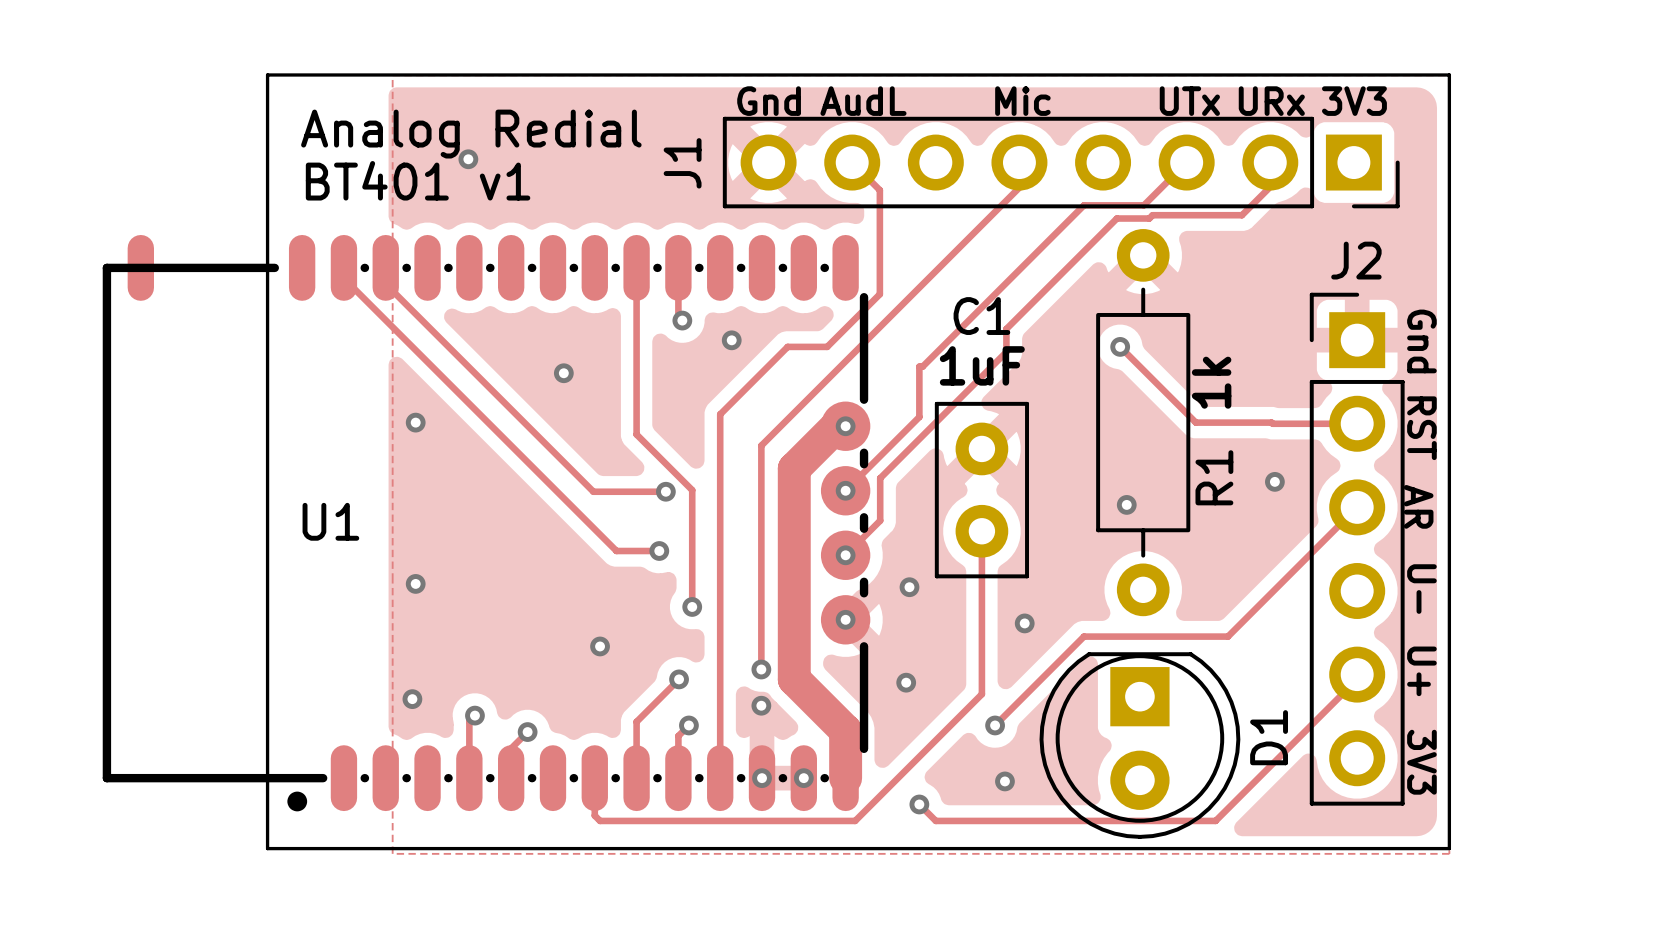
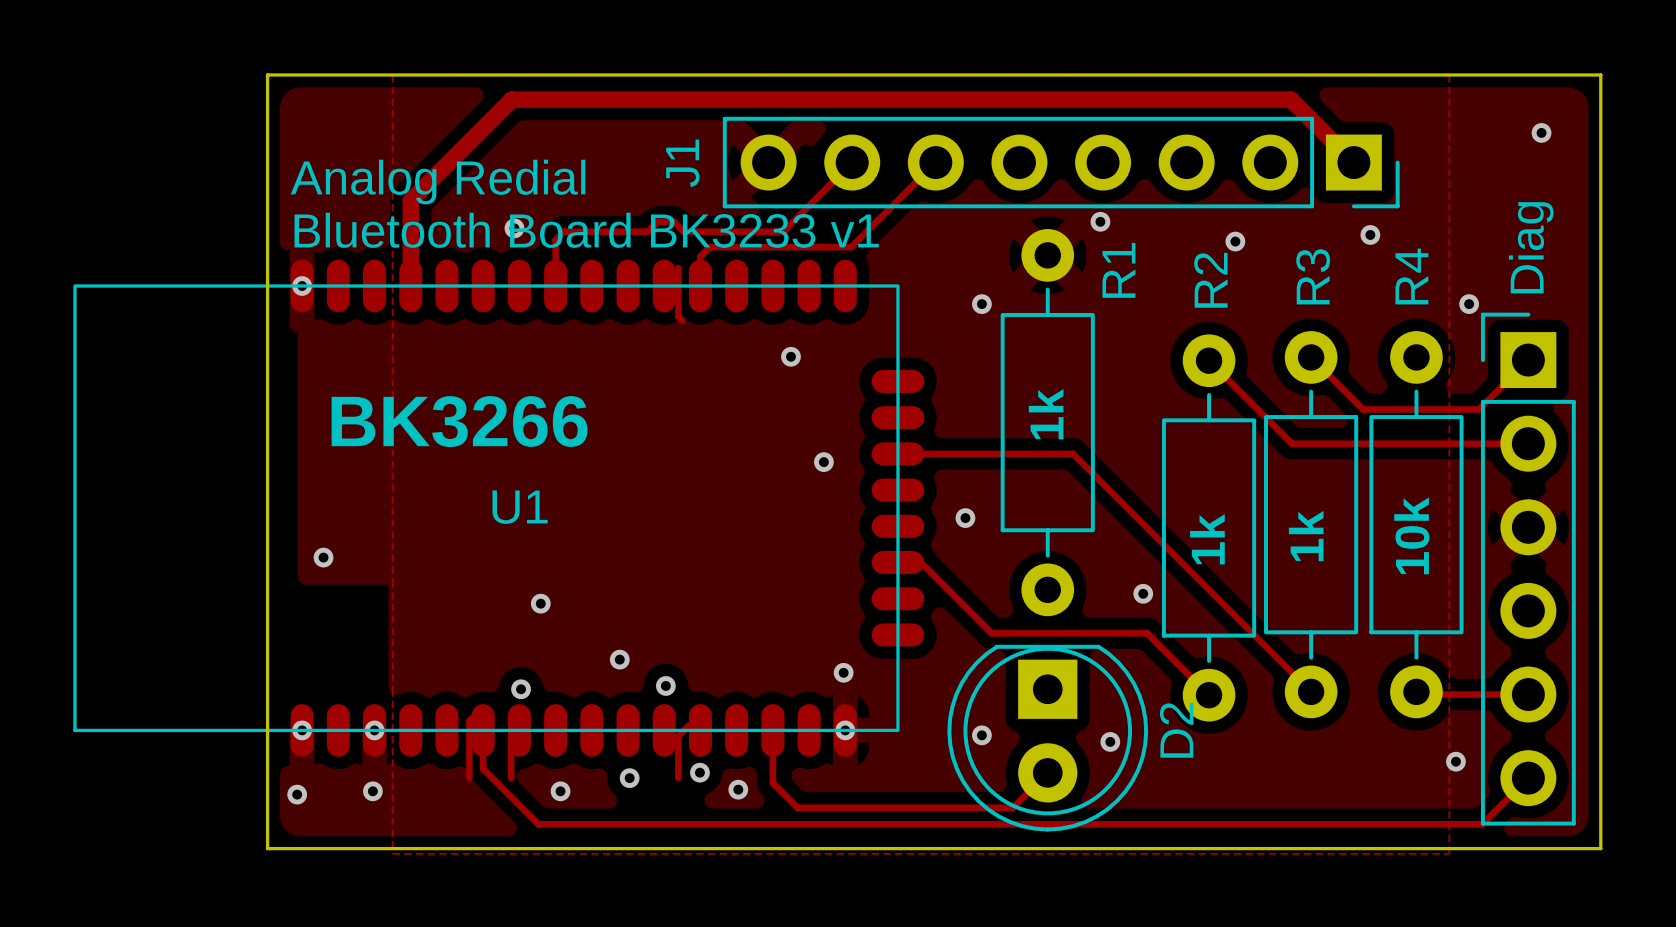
board edge: (1449, 74) (1449, 848) -> (1449, 74) (1600, 74) (1600, 848) (1449, 848)
text: Gnd (769, 101) -> none
text: AudL (863, 101) -> none
text: Mic (1022, 101) -> none
text: UTx (1189, 101) -> none
text: URx (1271, 101) -> none
text: 3V3 (1354, 101) -> none
via: none -> (1541, 132)
text position: Analog Redial (471, 134) -> Analog Redial (438, 182)
via: (468, 159) -> none
track: (852, 162) (879, 190) (879, 294) (827, 346) (787, 346) (720, 414) (720, 778) -> (852, 162) (783, 231) (683, 231) (674, 221) (657, 221) (647, 231) (563, 231) (555, 239) (555, 286)
track: none -> (935, 162) (851, 247) (709, 247) (700, 256) (700, 286)
track: (1019, 162) (1019, 187) (761, 445) (761, 669) -> none
track: (1186, 162) (1143, 205) (1083, 205) (922, 366) (919, 366) (919, 417) (845, 490) -> none
track: (1270, 162) (1270, 186) (1241, 215) (1152, 215) (1149, 218) (1116, 218) (1006, 328) (1006, 352) (880, 478) (880, 520) (845, 555) -> none
track: none -> (1353, 162) (1291, 99) (511, 99) (410, 200) (410, 286)
text: BT401 v1 (418, 180) -> none
via: none -> (1100, 221)
via: none -> (514, 228)
text: none -> Bluetooth Board BK3233 v1 (586, 230)
U1 footprint: [102, 234, 871, 812] -> [73, 259, 925, 757]
via: none -> (1370, 234)
via: none -> (1235, 241)
track: (343, 267) (343, 278) (616, 551) (659, 551) -> none
track: (385, 267) (385, 284) (593, 491) (665, 491) -> none
track: (636, 267) (636, 434) (692, 490) (692, 606) -> none
via: none -> (302, 286)
via: none -> (981, 304)
via: none -> (1469, 304)
via: (682, 320) -> none
via: (731, 340) -> none
text: Gnd (1421, 341) -> none
track: (1120, 346) (1195, 422) (1357, 423) -> none
via: (1120, 346) -> none
via: none -> (790, 356)
track: none -> (1311, 357) (1363, 409) (1479, 409) (1528, 360)
track: none -> (1209, 360) (1292, 443) (1528, 443)
text: 1uF (982, 365) -> none
via: (563, 373) -> none
text: 1k (1211, 382) -> none
text: none -> 1k (1046, 414)
text: none -> BK3266 (459, 421)
via: (415, 422) -> none
R1 position: (1143, 422) -> (1047, 422)
track: (845, 426) (836, 426) (794, 468) (794, 679) (845, 730) (845, 778) -> none
via: (845, 426) -> none
text: RST (1421, 428) -> none
track: none -> (897, 453) (1073, 453) (1311, 691)
via: none -> (823, 462)
R1 name position: R1 (1214, 477) -> R1 (1118, 270)
via: (1274, 481) -> none
via: (845, 490) -> none
C1: (981, 490) -> none
via: (665, 491) -> none
via: (1126, 504) -> none
text: AR (1418, 506) -> none
track: (1357, 507) (1227, 636) (1083, 636) (995, 725) -> none
via: none -> (965, 518)
U1 name position: U1 (330, 521) -> U1 (520, 507)
R3: none -> (1311, 524)
R4: none -> (1416, 524)
R2: none -> (1209, 527)
text: none -> 1k (1306, 536)
track: (981, 531) (981, 694) (855, 820) (600, 820) (594, 815) (594, 778) -> none
text: none -> 1k (1207, 539)
J2: (1357, 549) -> none
via: (659, 551) -> none
via: (845, 555) -> none
via: none -> (323, 557)
track: none -> (897, 562) (921, 562) (991, 633) (1147, 633) (1209, 695)
Diag: none -> (1528, 569)
via: (415, 583) -> none
via: (909, 587) -> none
text: U- (1421, 589) -> 10k (1411, 535)
via: none -> (1143, 593)
via: none -> (540, 603)
via: (692, 606) -> none
via: (845, 619) -> none
via: (1024, 623) -> none
via position: (600, 646) -> (619, 659)
via: (761, 669) -> none
text: U+ (1421, 671) -> none
via: none -> (843, 672)
track: (1357, 674) (1357, 679) (1215, 820) (935, 820) (919, 804) -> none
track: (679, 679) (636, 721) (636, 778) -> none
via position: (679, 679) -> (665, 685)
via: (906, 682) -> none
via: none -> (521, 689)
track: none -> (1416, 691) (1419, 694) (1528, 694)
via position: (412, 699) -> (374, 730)
via: (761, 705) -> none
via: (474, 715) -> none
via: (688, 725) -> none
via position: (995, 725) -> (981, 735)
via: none -> (302, 730)
track: none -> (483, 730) (483, 768) (538, 824) (1482, 824) (1528, 778)
track: none -> (772, 730) (772, 783) (797, 807) (1012, 807) (1047, 772)
via: none -> (845, 730)
via: (527, 732) -> none
D2: none -> (1047, 738)
via: none -> (1110, 741)
D1: (1139, 745) -> none
via: none -> (1455, 761)
text: 3V3 (1421, 762) -> none
via: none -> (699, 772)
via: none -> (629, 778)
via position: (762, 778) -> (738, 789)
via: (803, 778) -> none
via: (1004, 781) -> none
via: none -> (372, 791)
via: none -> (560, 791)
via: none -> (297, 794)
via: (919, 804) -> none

